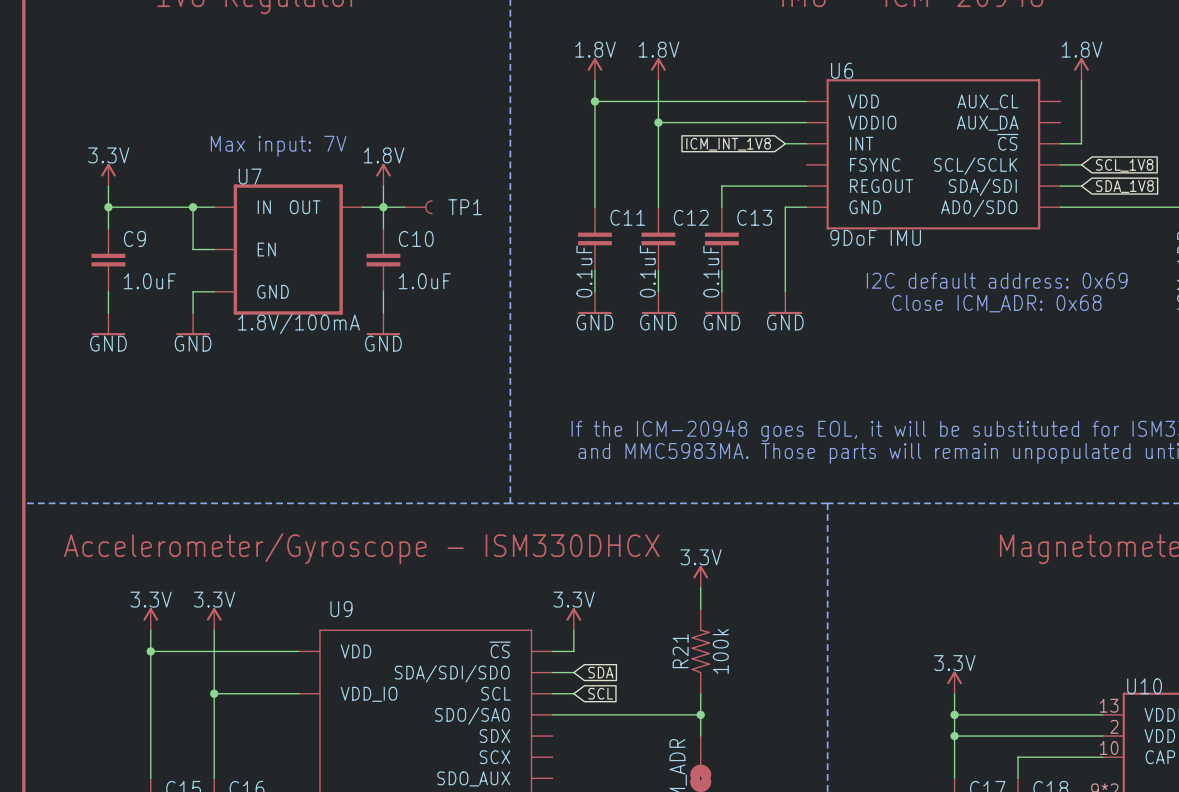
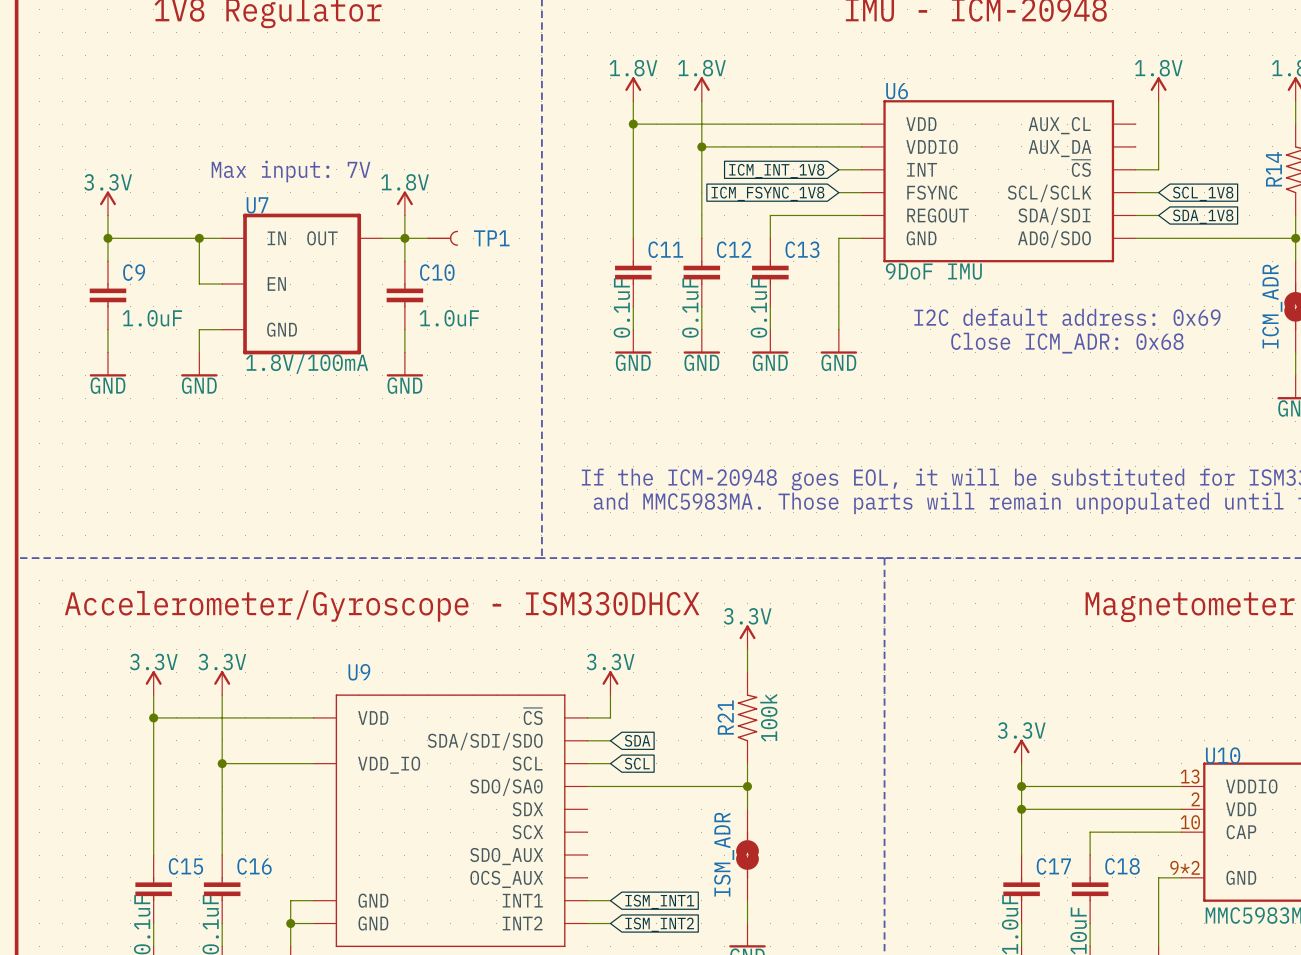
wire: none -> (838, 192) (861, 192)
global label: none -> ICM_FSYNC_1V8 (767, 193)

